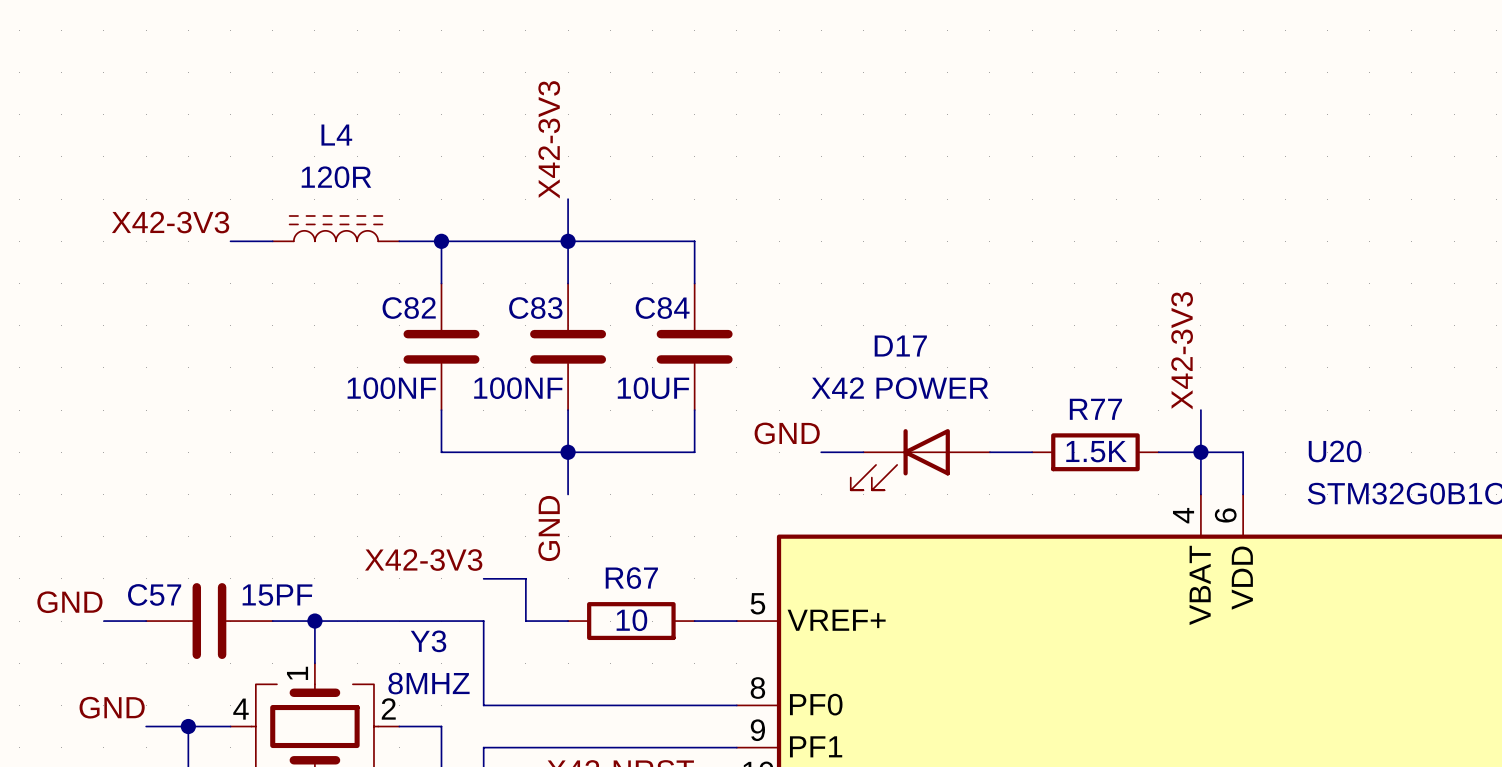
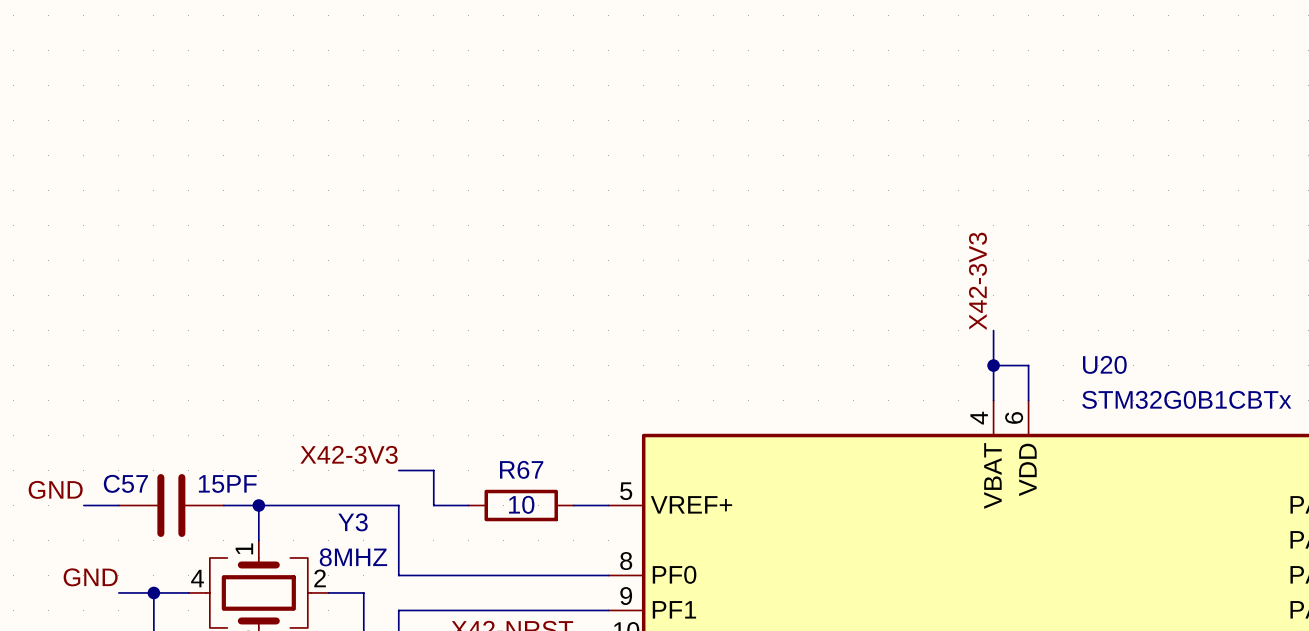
label: X42-3V3 (549, 139) -> none
wire: (568, 199) (568, 283) -> none
label: X42-3V3 (170, 222) -> none
L4: 120R (336, 228) -> none
wire: (230, 241) (272, 241) -> none
wire: (399, 241) (694, 241) (694, 283) -> none
wire: (441, 241) (441, 283) -> none
junction: (441, 241) -> none
junction: (568, 241) -> none
C82: 100NF (441, 346) -> none
C83: 100NF (568, 346) -> none
C84: 10UF (694, 346) -> none
wire: (441, 410) (441, 452) (694, 452) (694, 410) -> none
wire: (568, 410) (568, 494) -> none
label: GND (787, 433) -> none
junction: (568, 452) -> none
wire: (821, 452) (863, 452) -> none
wire: (989, 452) (1032, 452) -> none
R77: 1.5K (1095, 452) -> none
wire: (1158, 452) (1200, 452) -> none
D17: X42 POWER (920, 459) -> none
label: GND (549, 528) -> none

